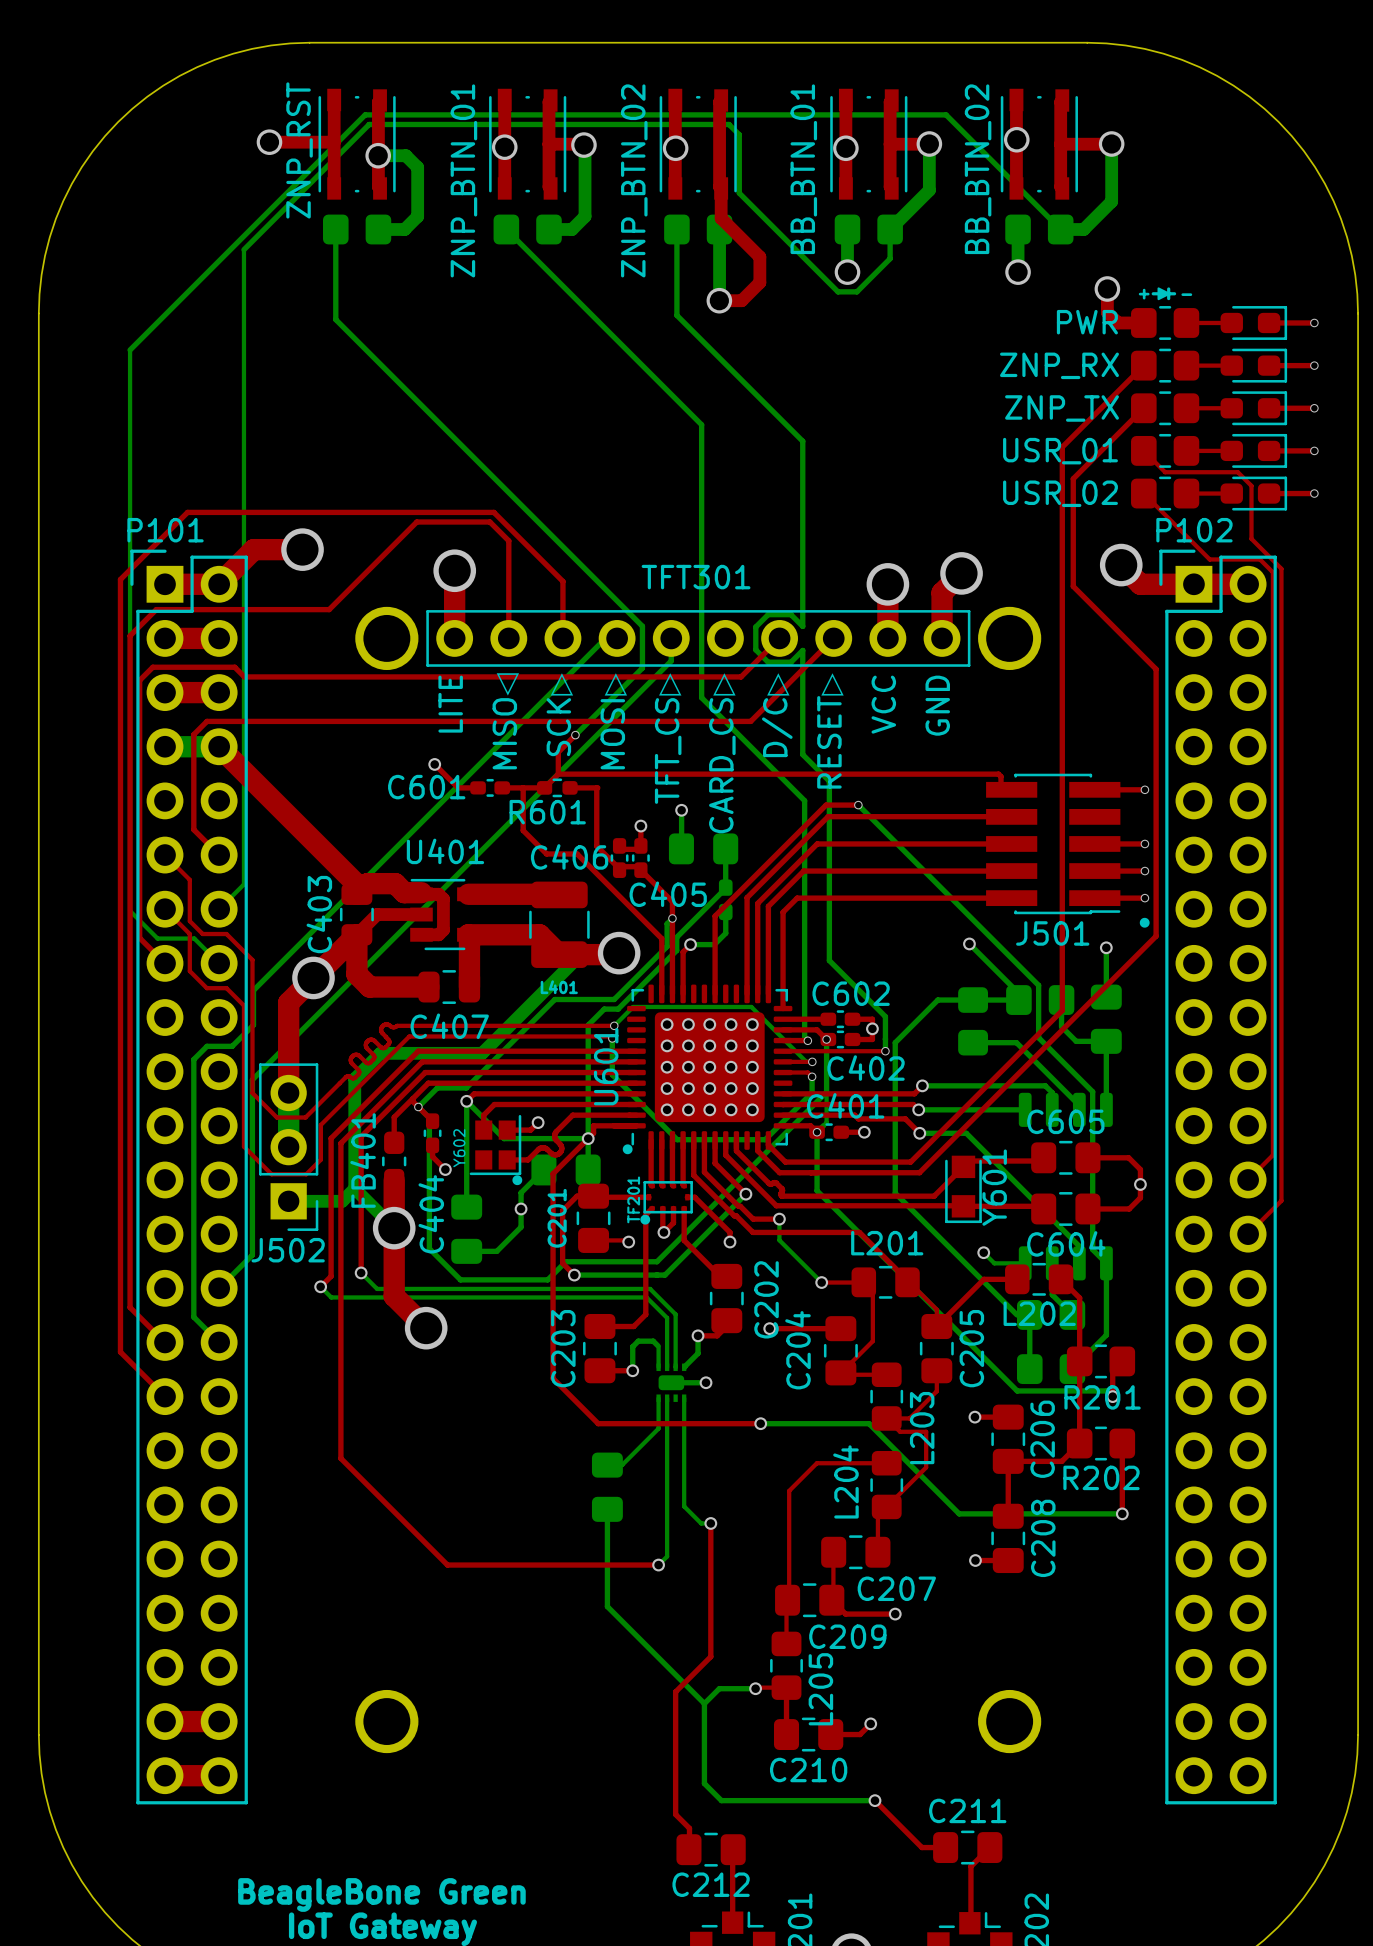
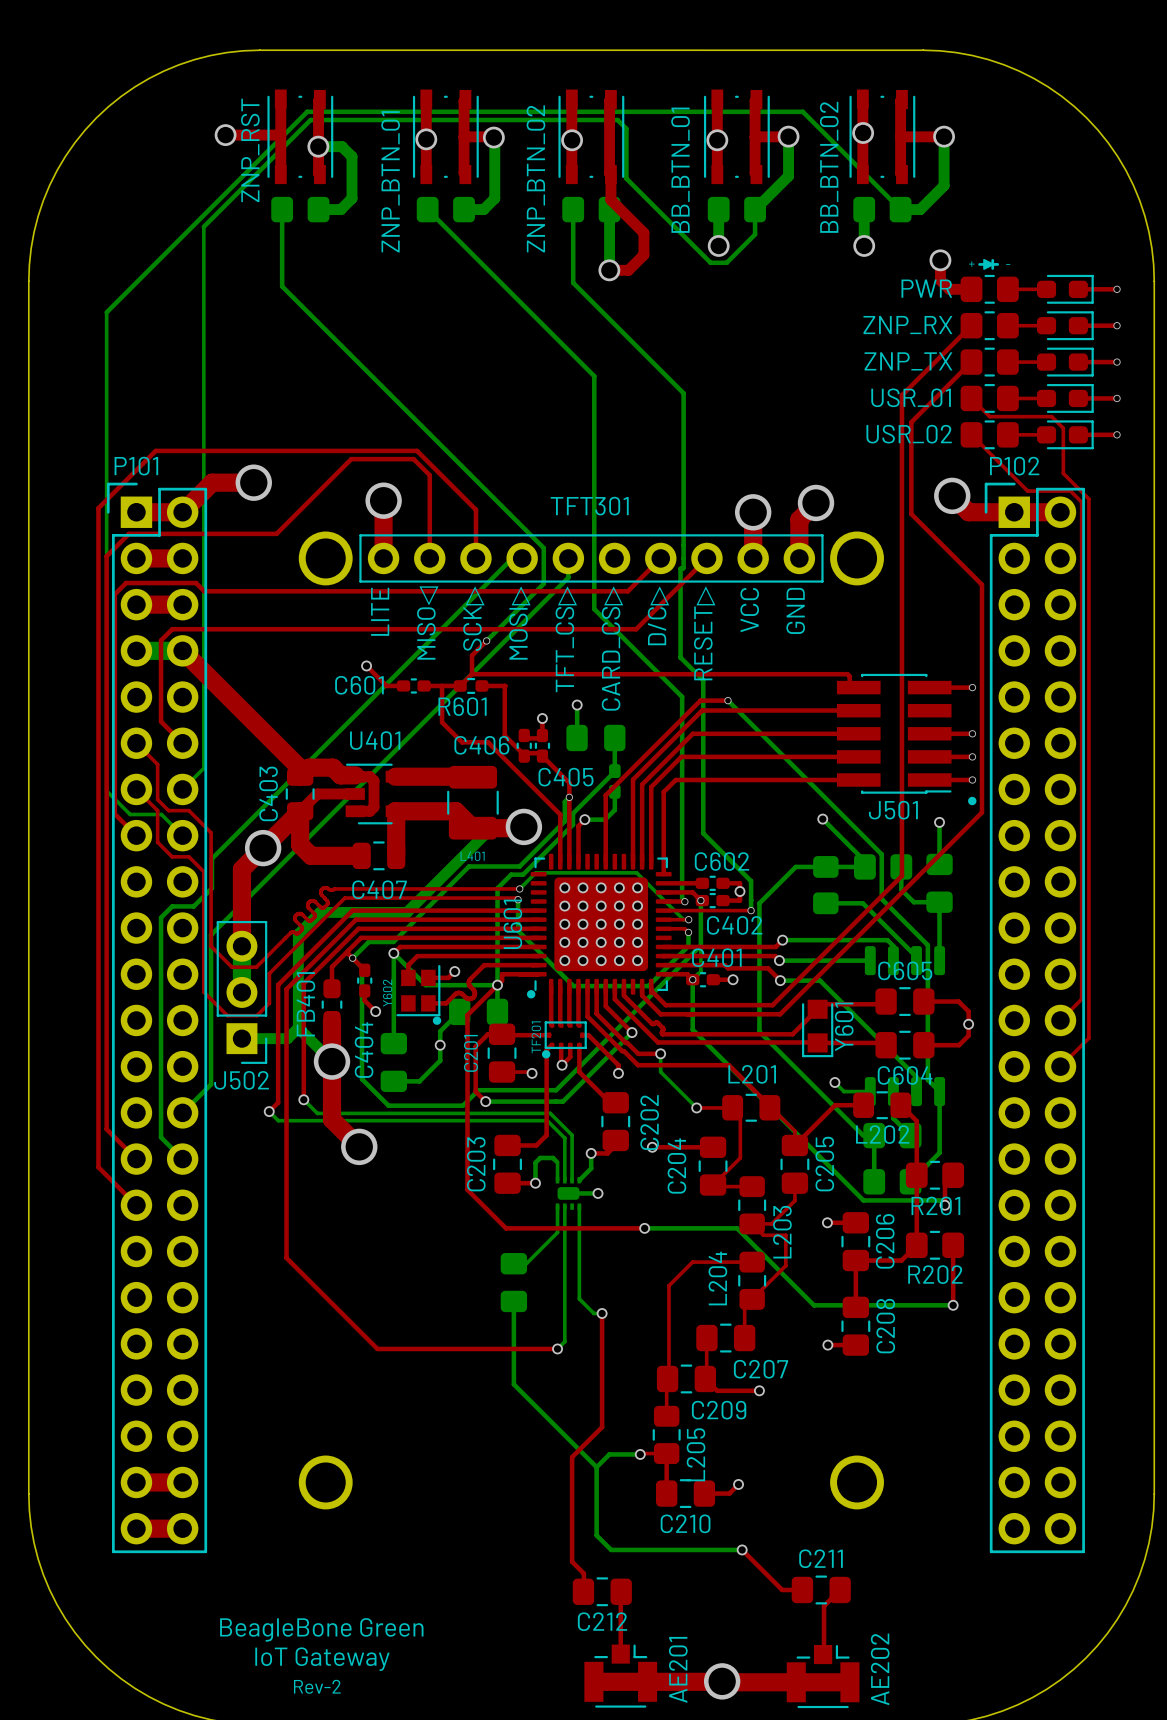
bottom track: (802, 441) (802, 626) (791, 614) (768, 614) (755, 627) (755, 649) (768, 662) (791, 662) (802, 650) -> (680, 390) (683, 393) (683, 545)
bottom track: none -> (683, 545) (683, 567) (680, 568)

